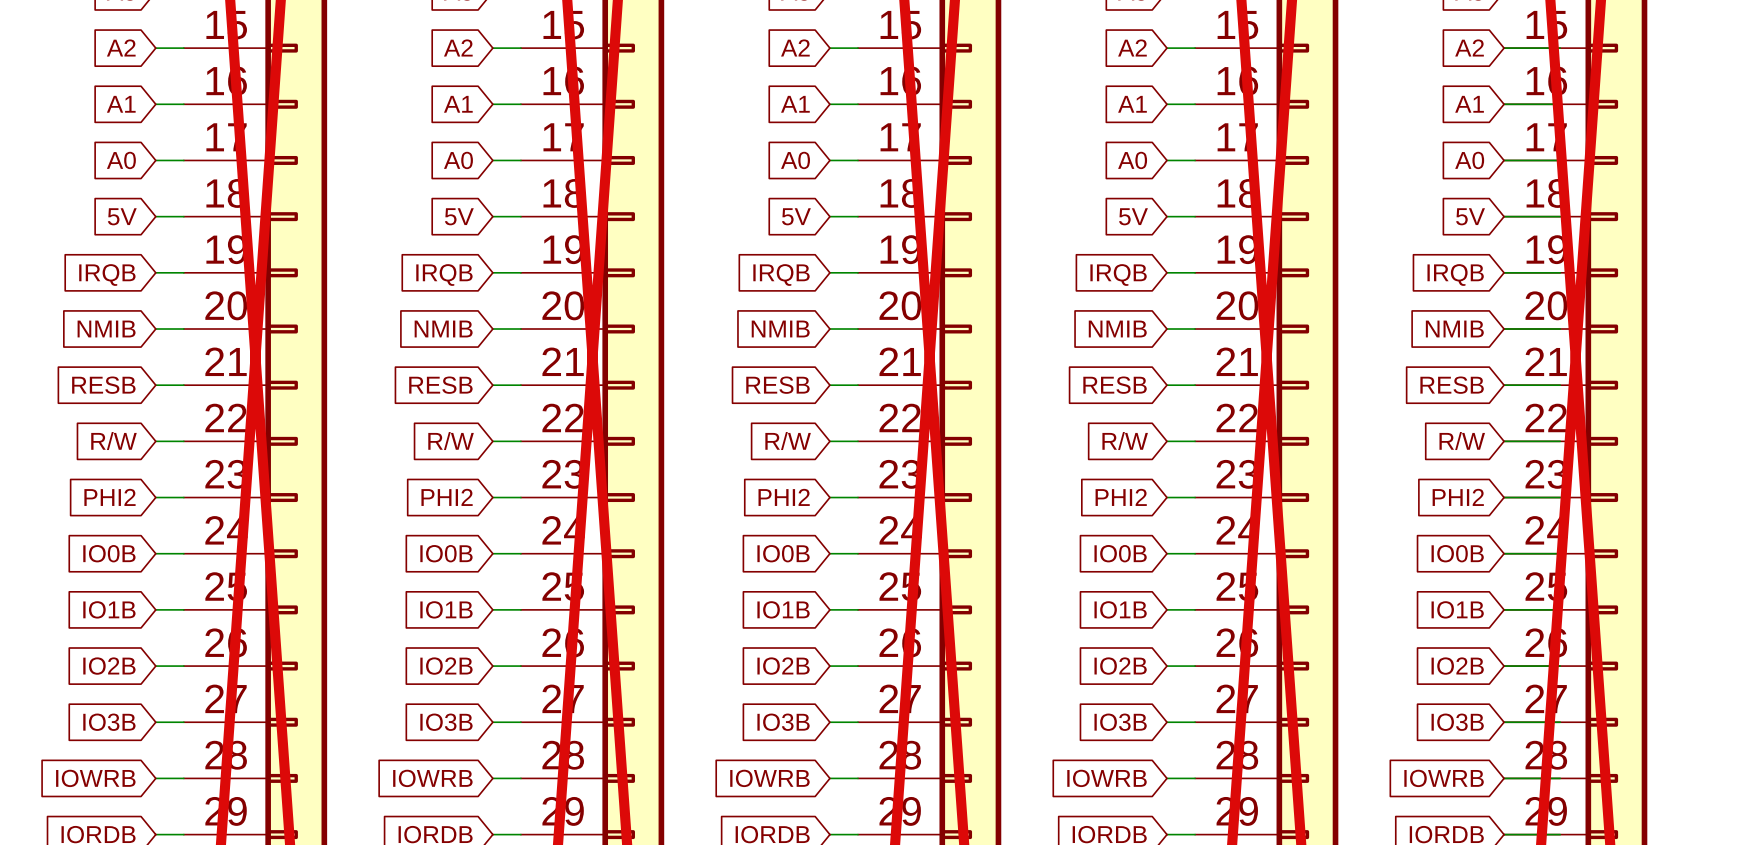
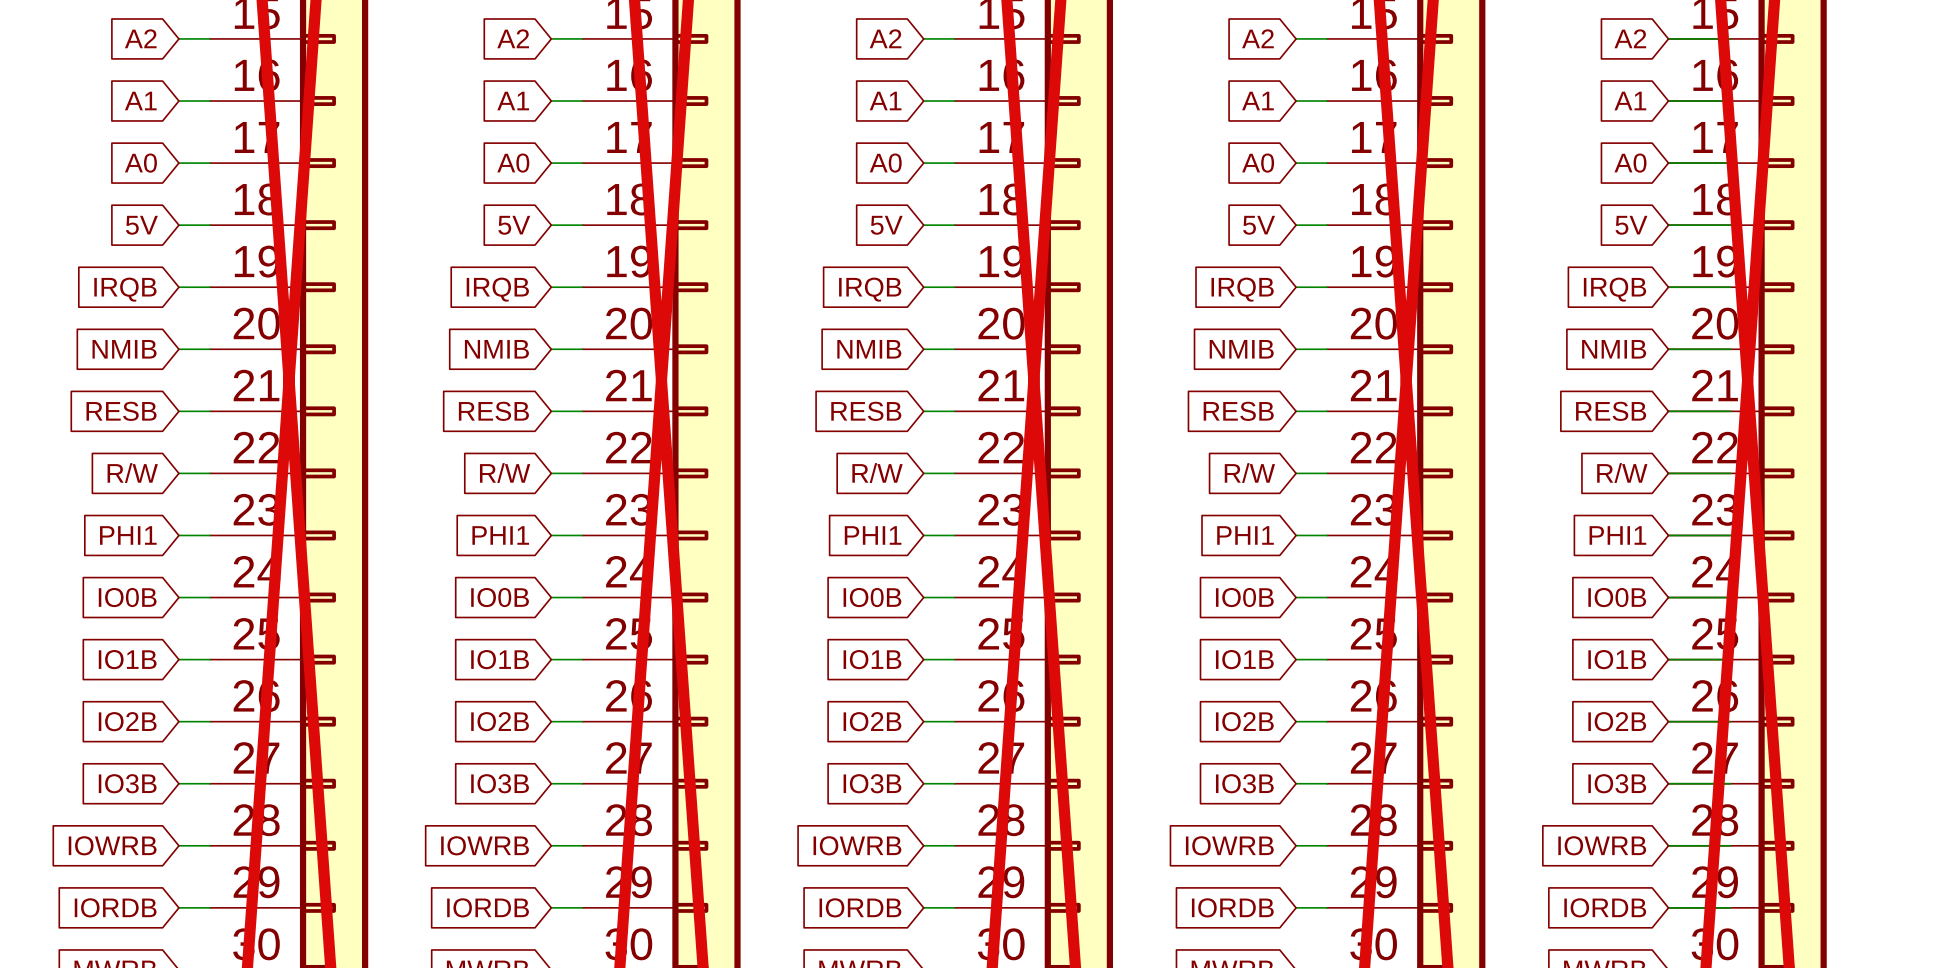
global label: PHI2 (109, 497) -> PHI1 (128, 535)
global label: PHI2 (447, 497) -> PHI1 (500, 535)
global label: PHI2 (784, 497) -> PHI1 (873, 535)
global label: PHI2 (1121, 497) -> PHI1 (1245, 535)
global label: PHI2 (1458, 497) -> PHI1 (1617, 535)

